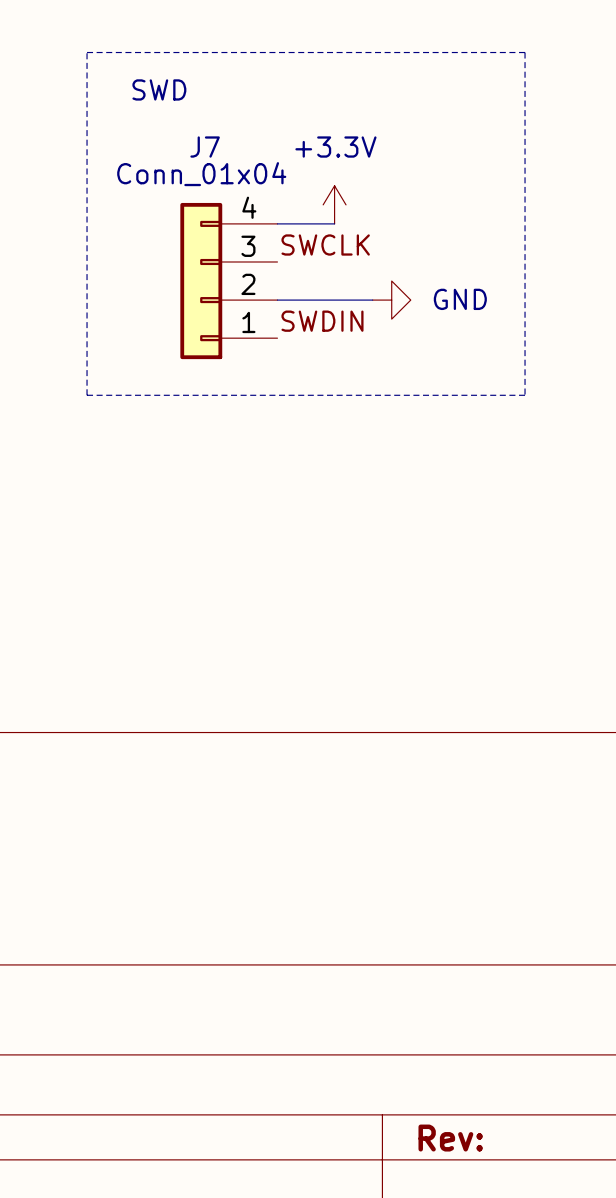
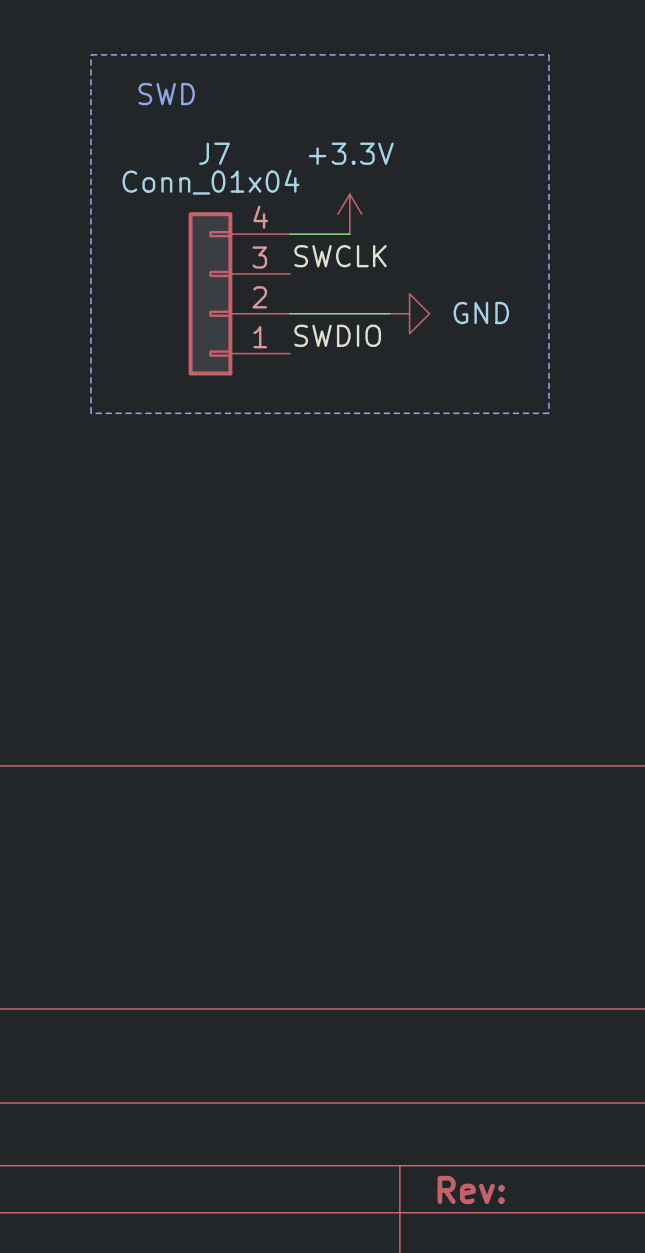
label: SWDIN (322, 321) -> SWDIO (337, 335)

